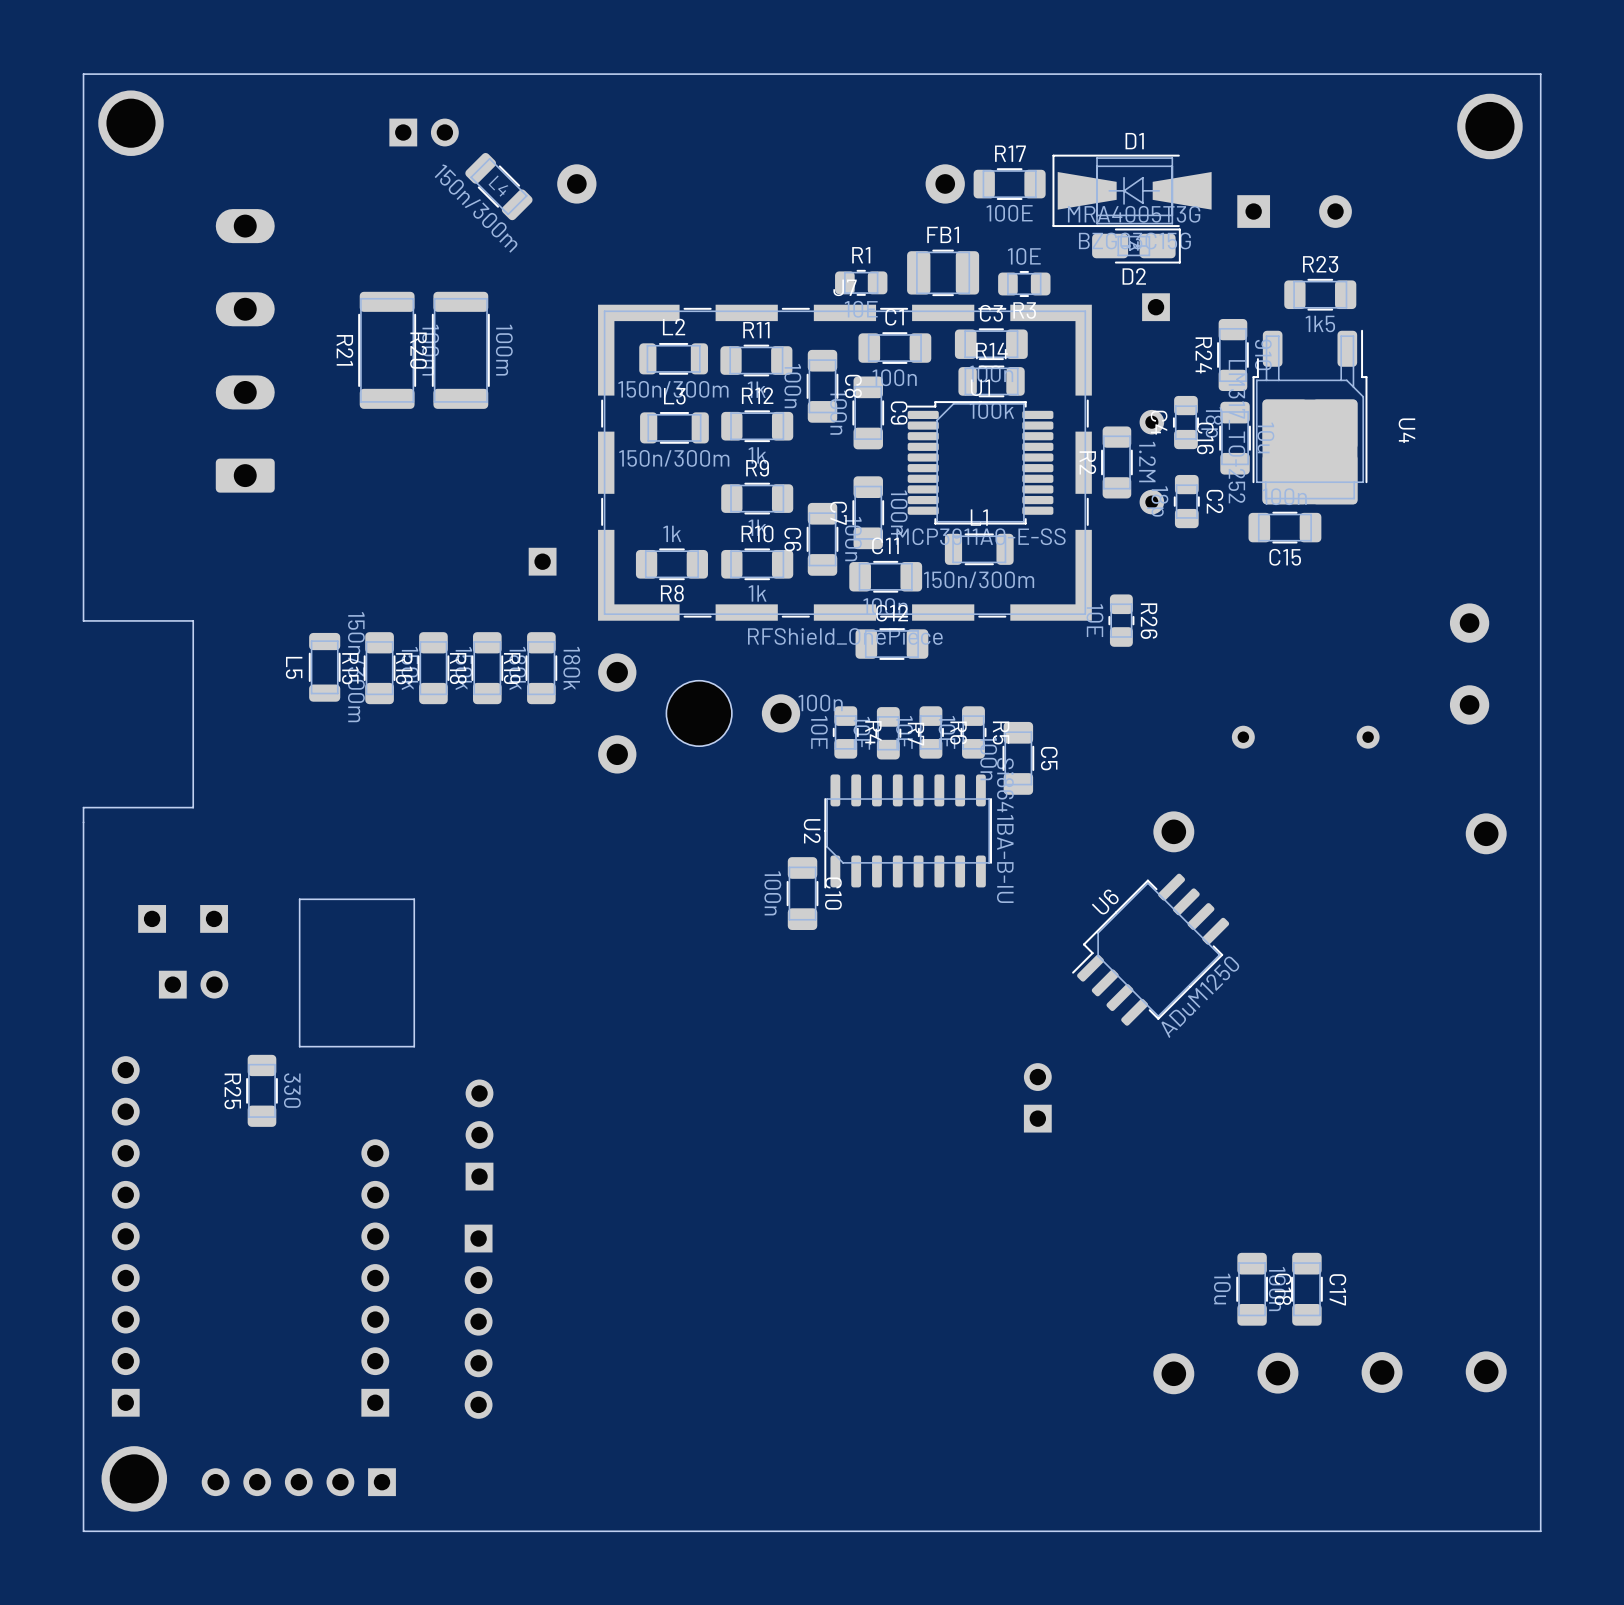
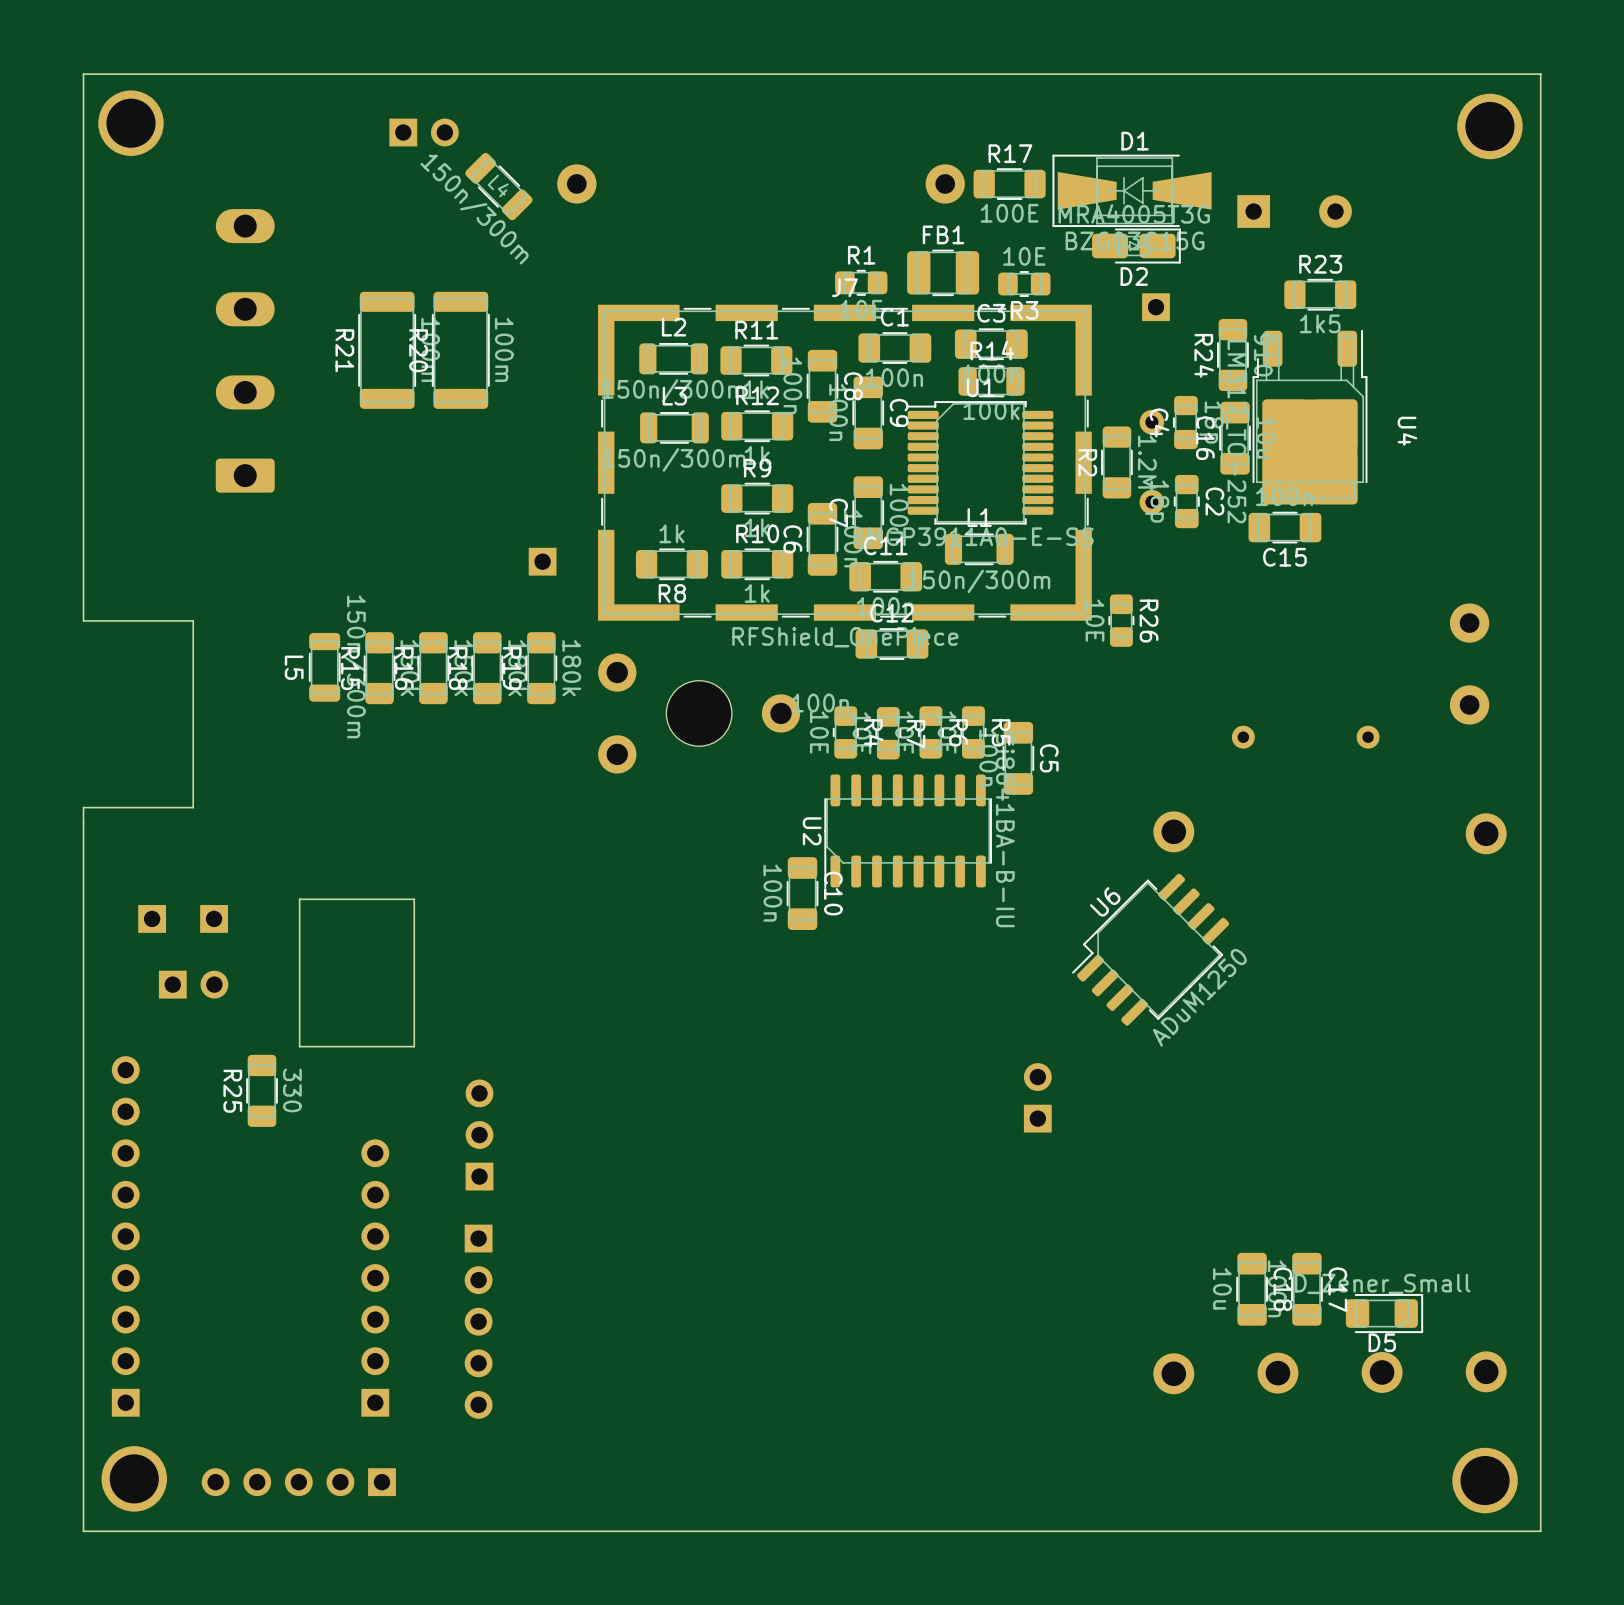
D5: none -> D_Zener_Small (1384, 1313)
part: none -> (1485, 1480)

